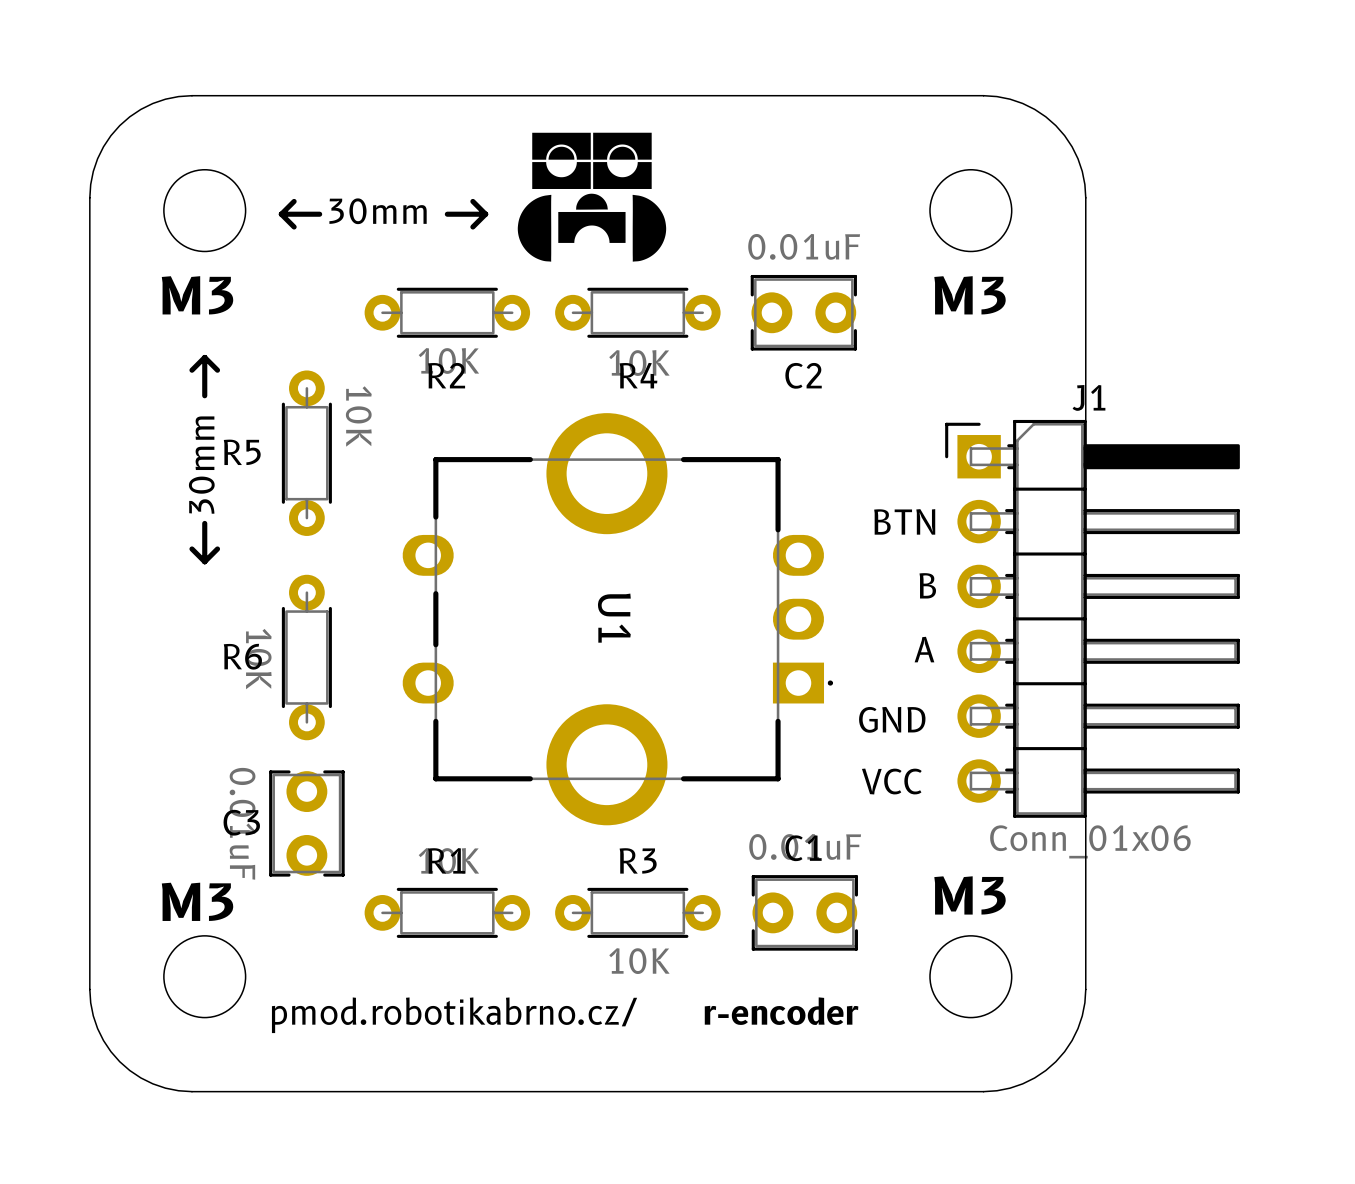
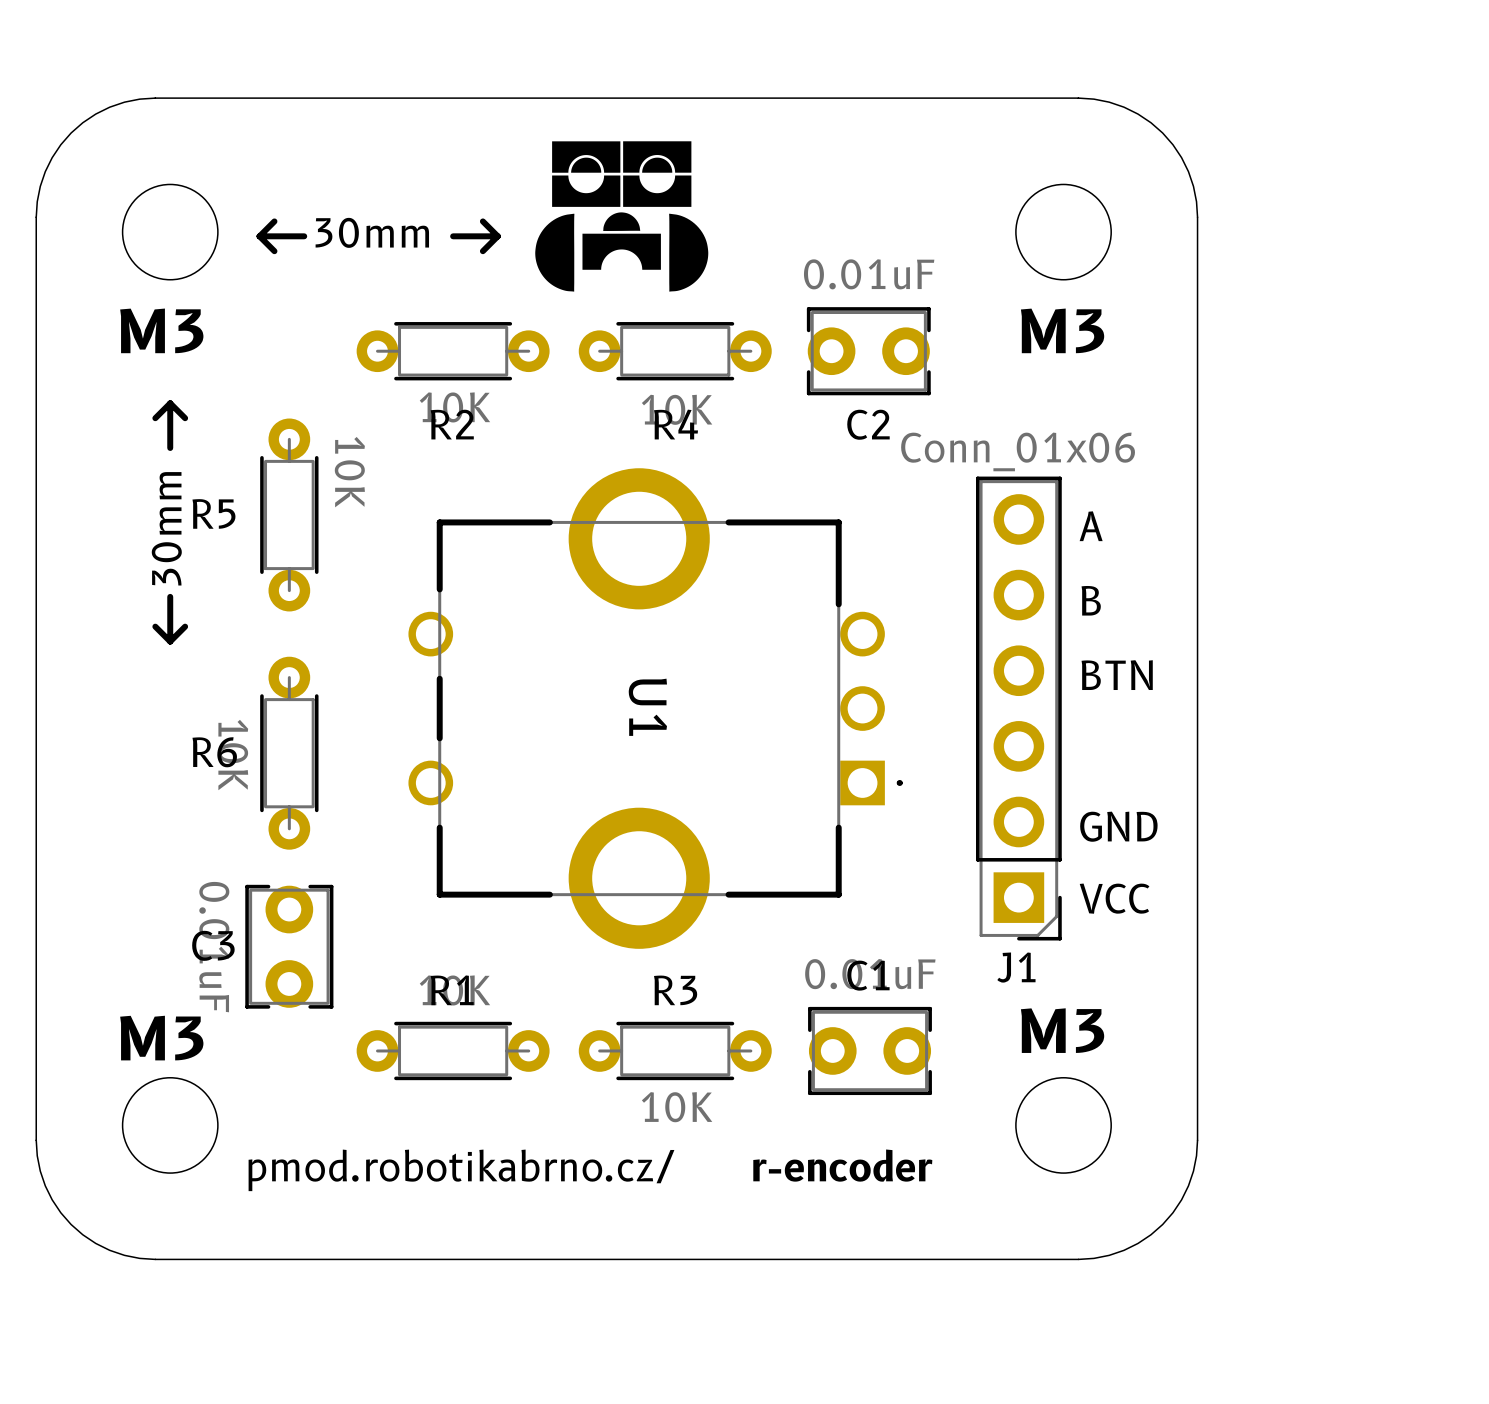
J1 name position: J1 (1089, 397) -> J1 (1016, 967)
U1 footprint: [402, 413, 833, 826] -> [408, 468, 903, 949]
J1 footprint: [945, 419, 1240, 818] -> [976, 476, 1062, 941]
text position: BTN (904, 521) -> BTN (1117, 675)
text position: B (927, 585) -> B (1091, 600)
text position: A (924, 649) -> A (1091, 526)
text position: GND (892, 719) -> GND (1118, 826)
text position: VCC (891, 781) -> VCC (1114, 898)
J1 value position: Conn_01x06 (1090, 841) -> Conn_01x06 (1018, 451)

